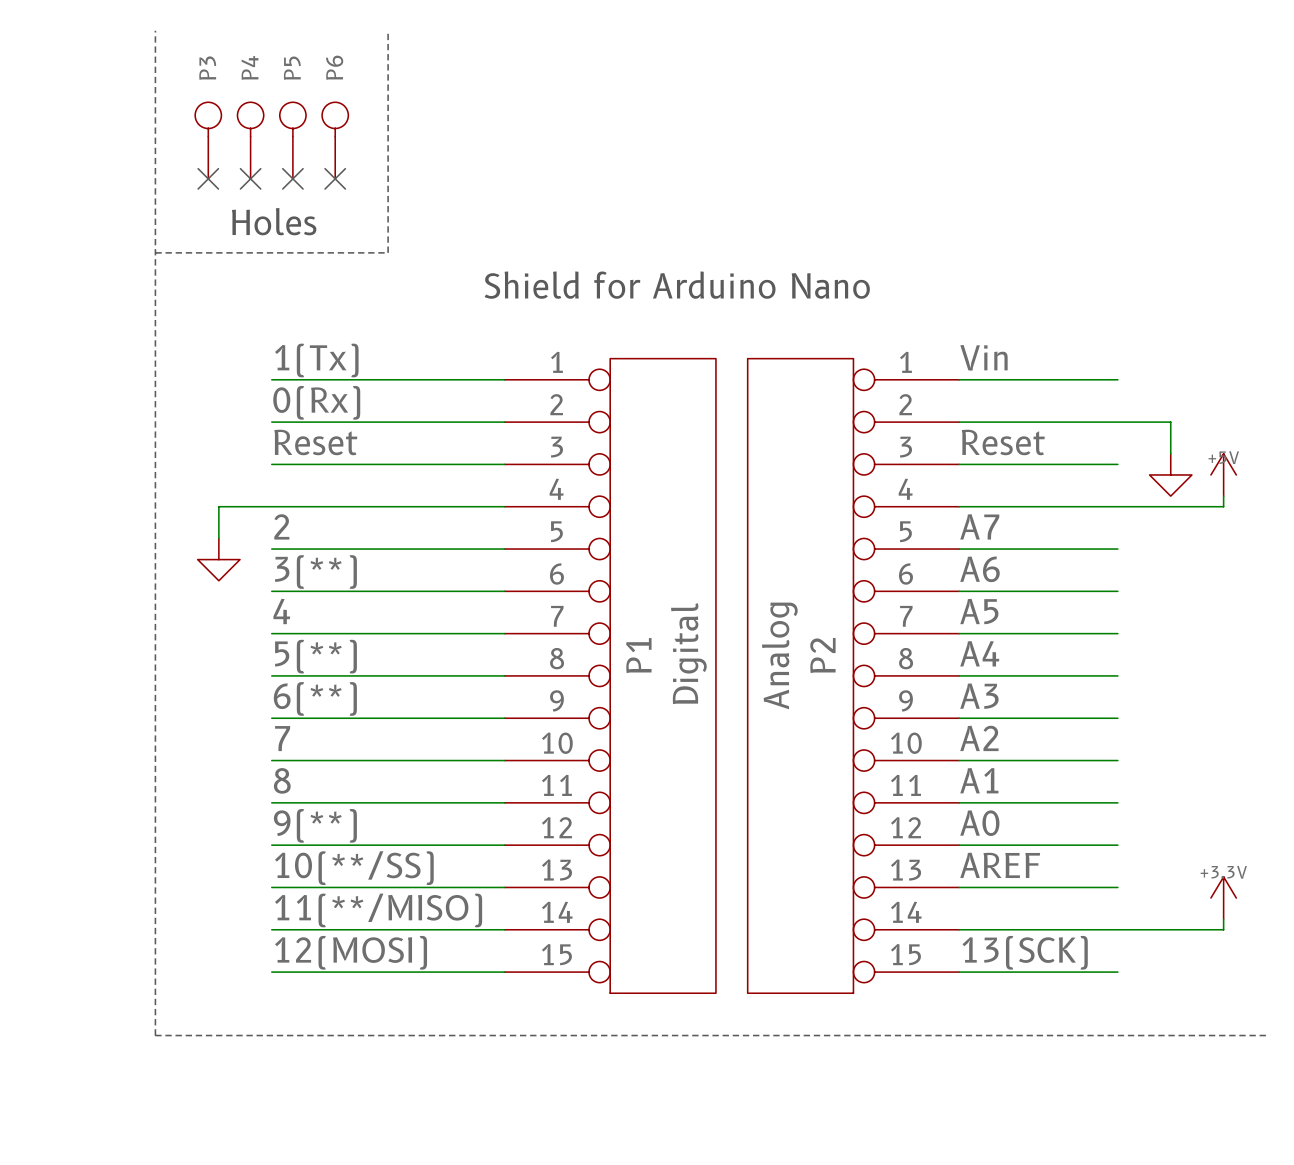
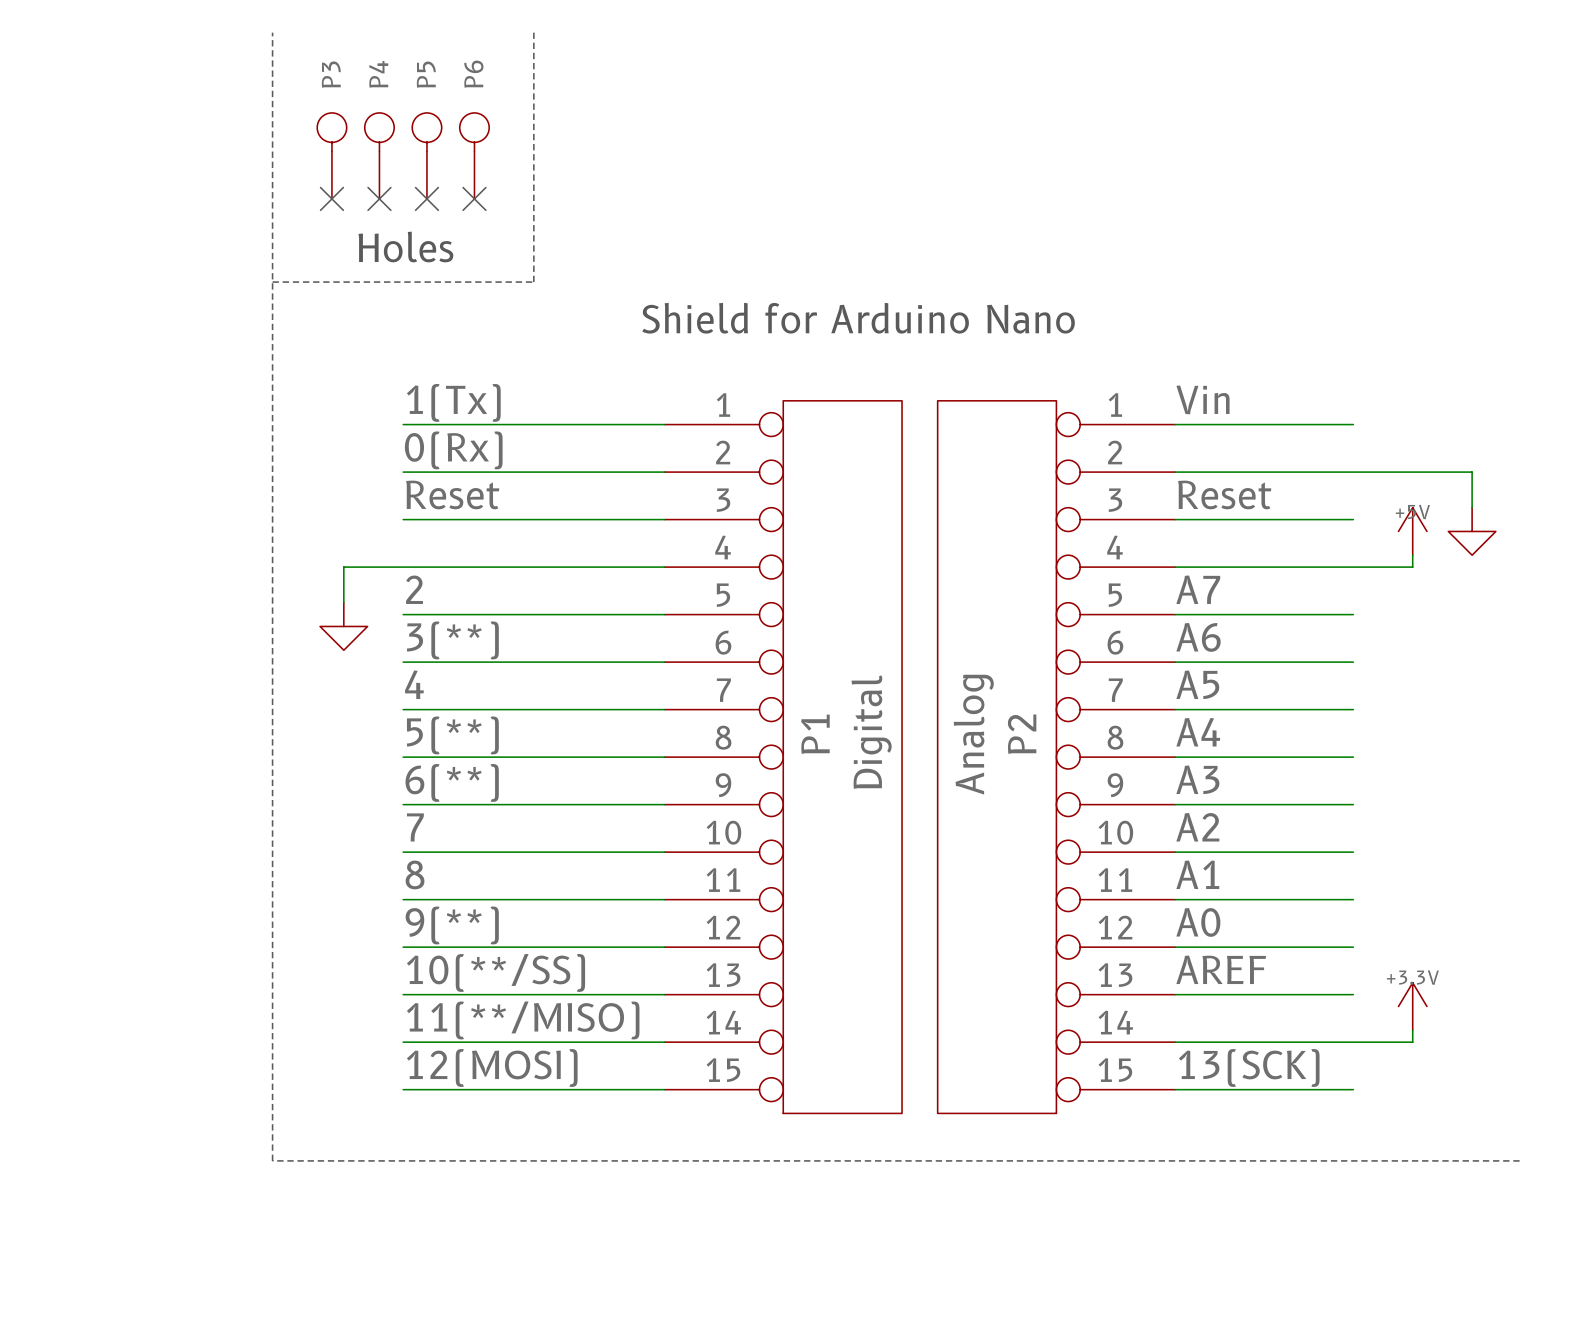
wire: (1170, 422) (1170, 453) -> (1412, 472) (1472, 472) (1472, 507)
power symbol shape: [1149, 453, 1192, 497] -> [1398, 507, 1427, 556]
power symbol shape: [1210, 453, 1237, 497] -> [1448, 507, 1496, 556]
power symbol text: none -> +5V (1412, 512)
power symbol text: +5V (1223, 457) -> none
wire: (1223, 496) (1223, 506) (1170, 506) -> (1412, 555) (1412, 567)
power symbol position: +3.3V (1223, 898) -> +3.3V (1412, 1006)
wire: (1223, 919) (1223, 929) (1170, 929) -> (1412, 1030) (1412, 1042)

